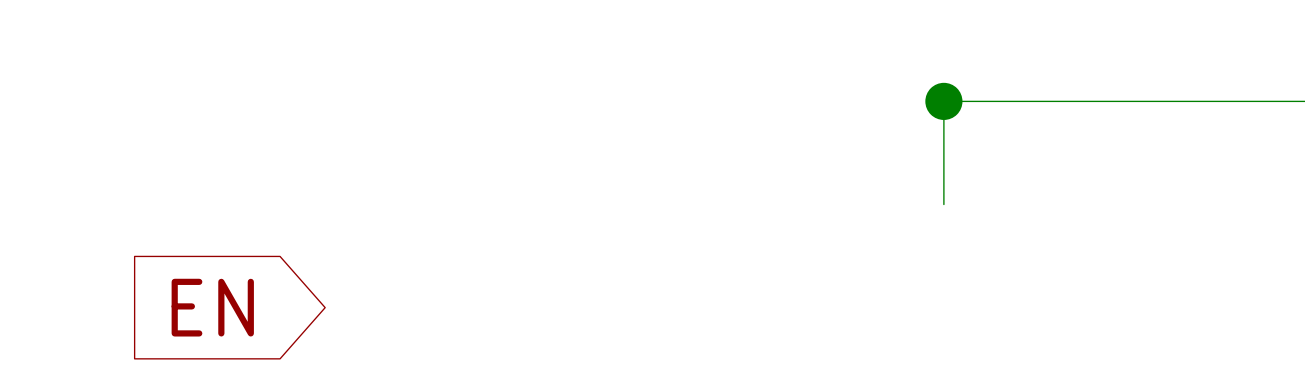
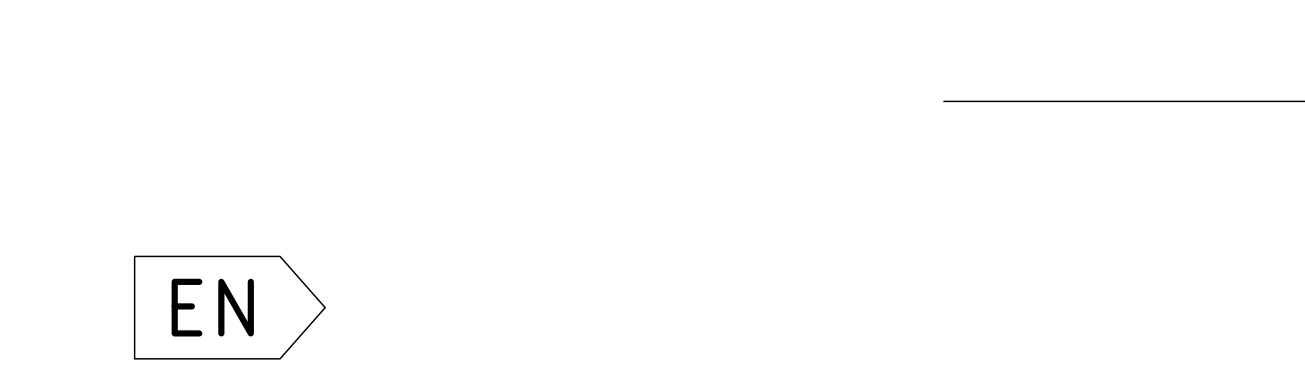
wire: (943, 101) (943, 204) -> none
junction: (943, 101) -> none

